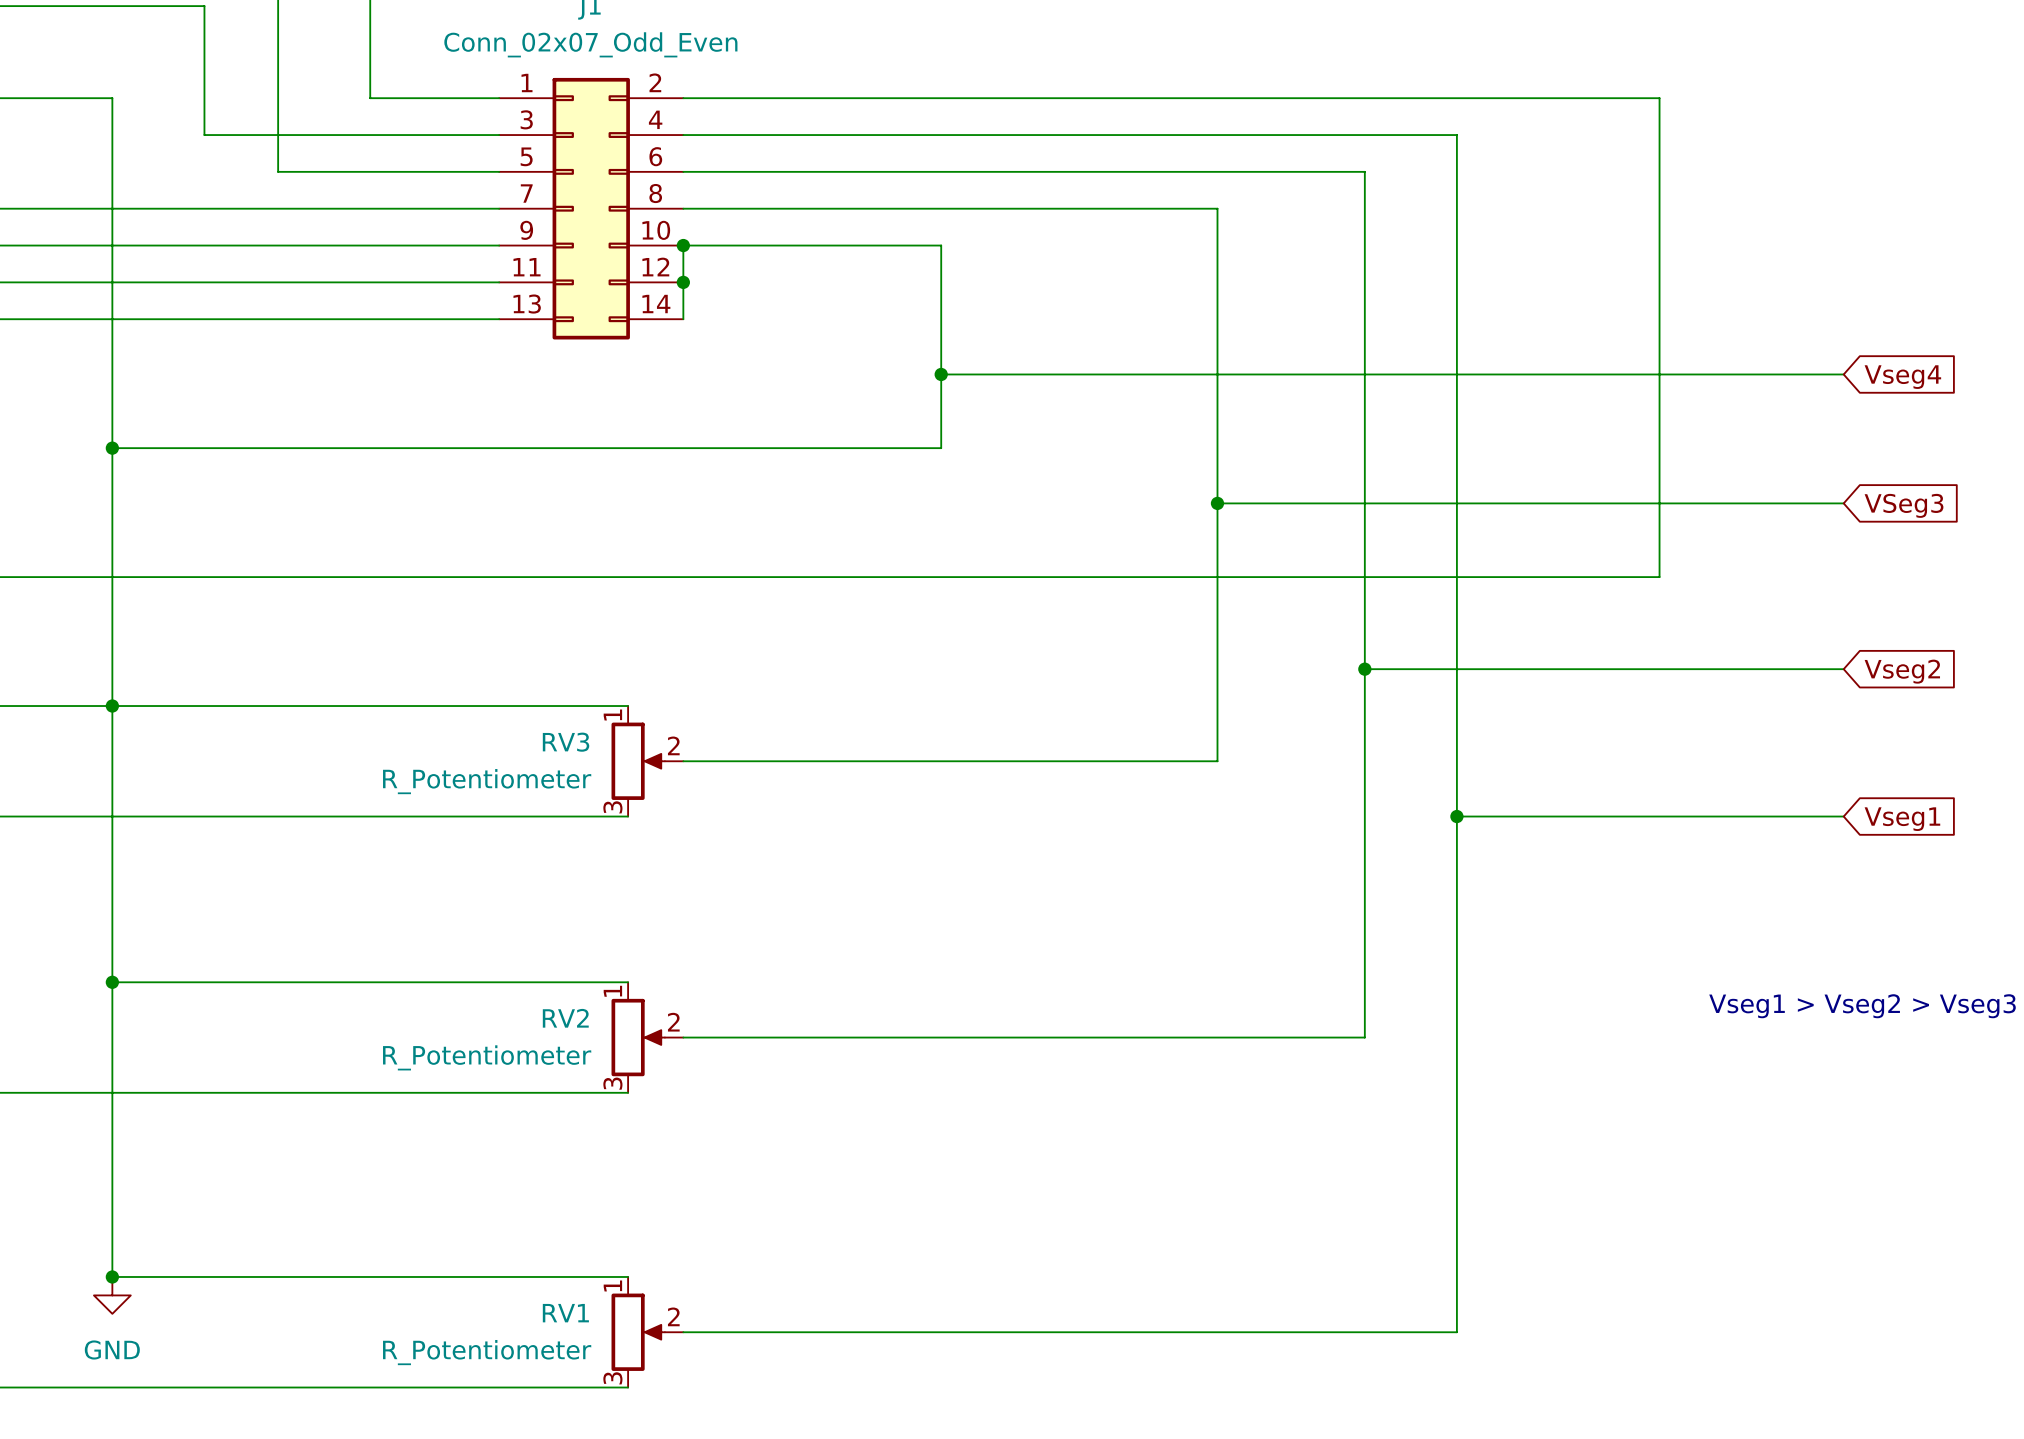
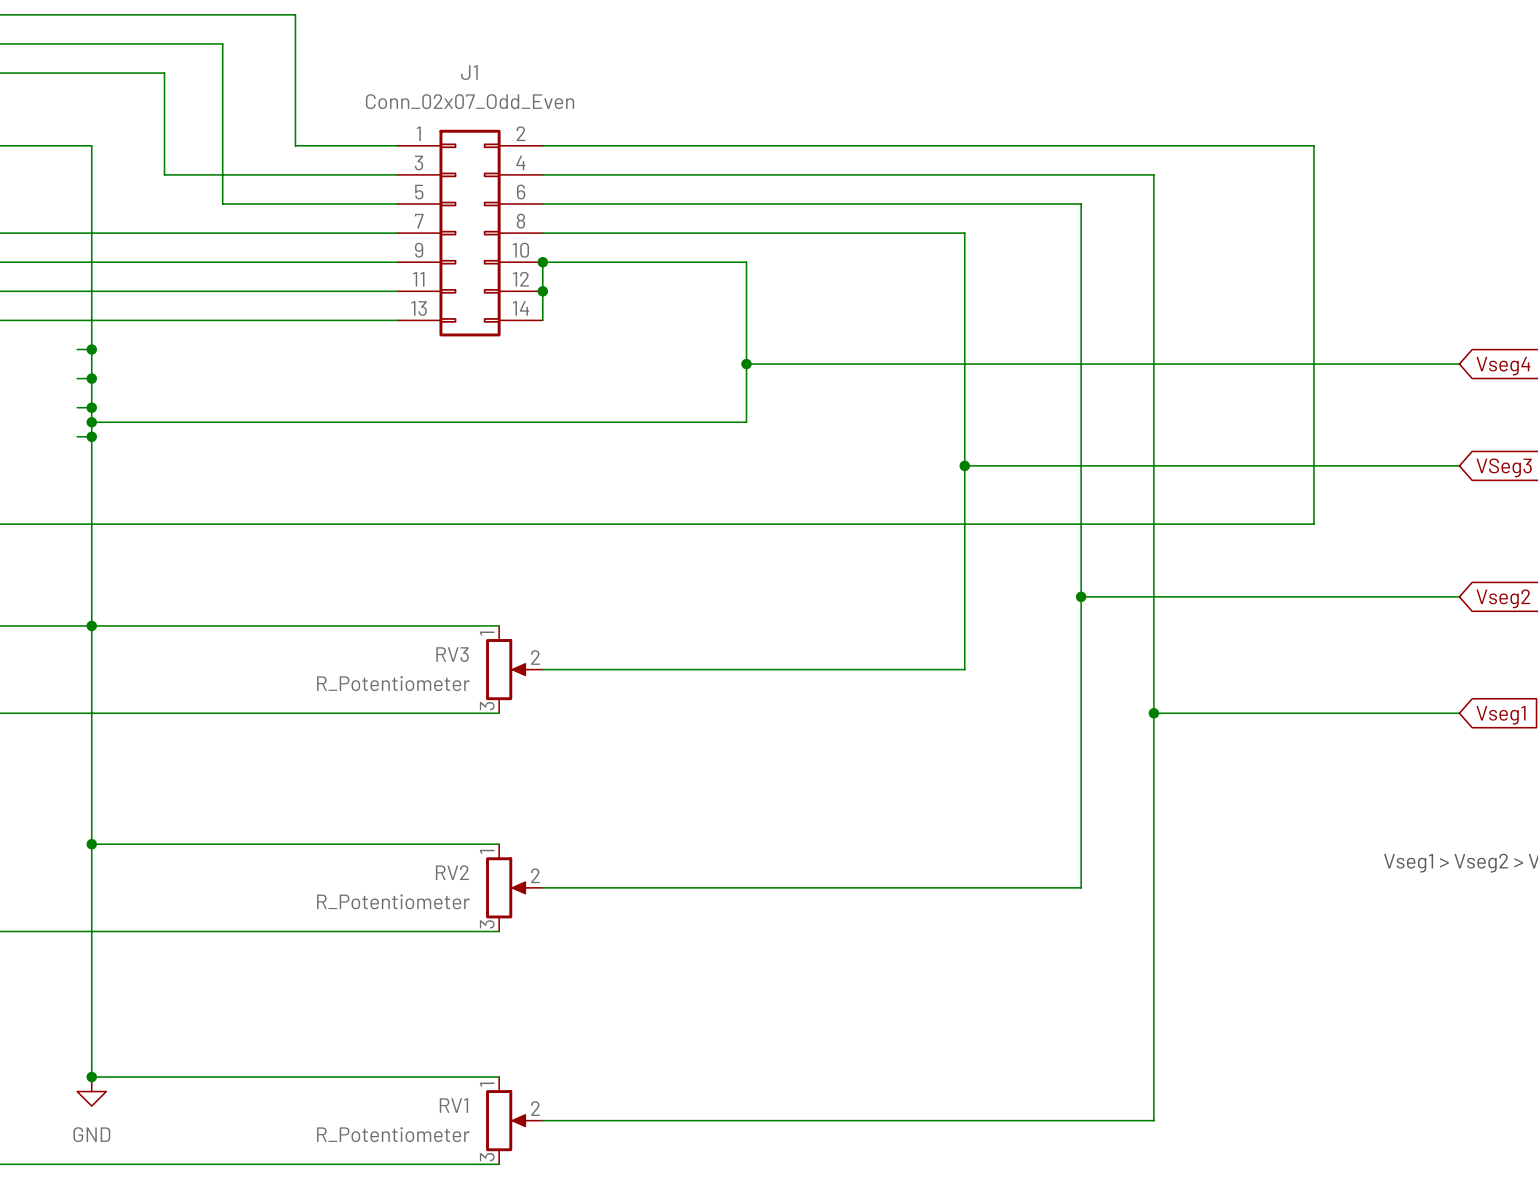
wire: none -> (77, 349) (91, 349)
junction: none -> (91, 349)
wire: none -> (77, 378) (91, 378)
junction: none -> (91, 378)
wire: none -> (77, 407) (91, 407)
junction: none -> (91, 407)
wire: none -> (77, 436) (91, 436)
junction: none -> (91, 436)

